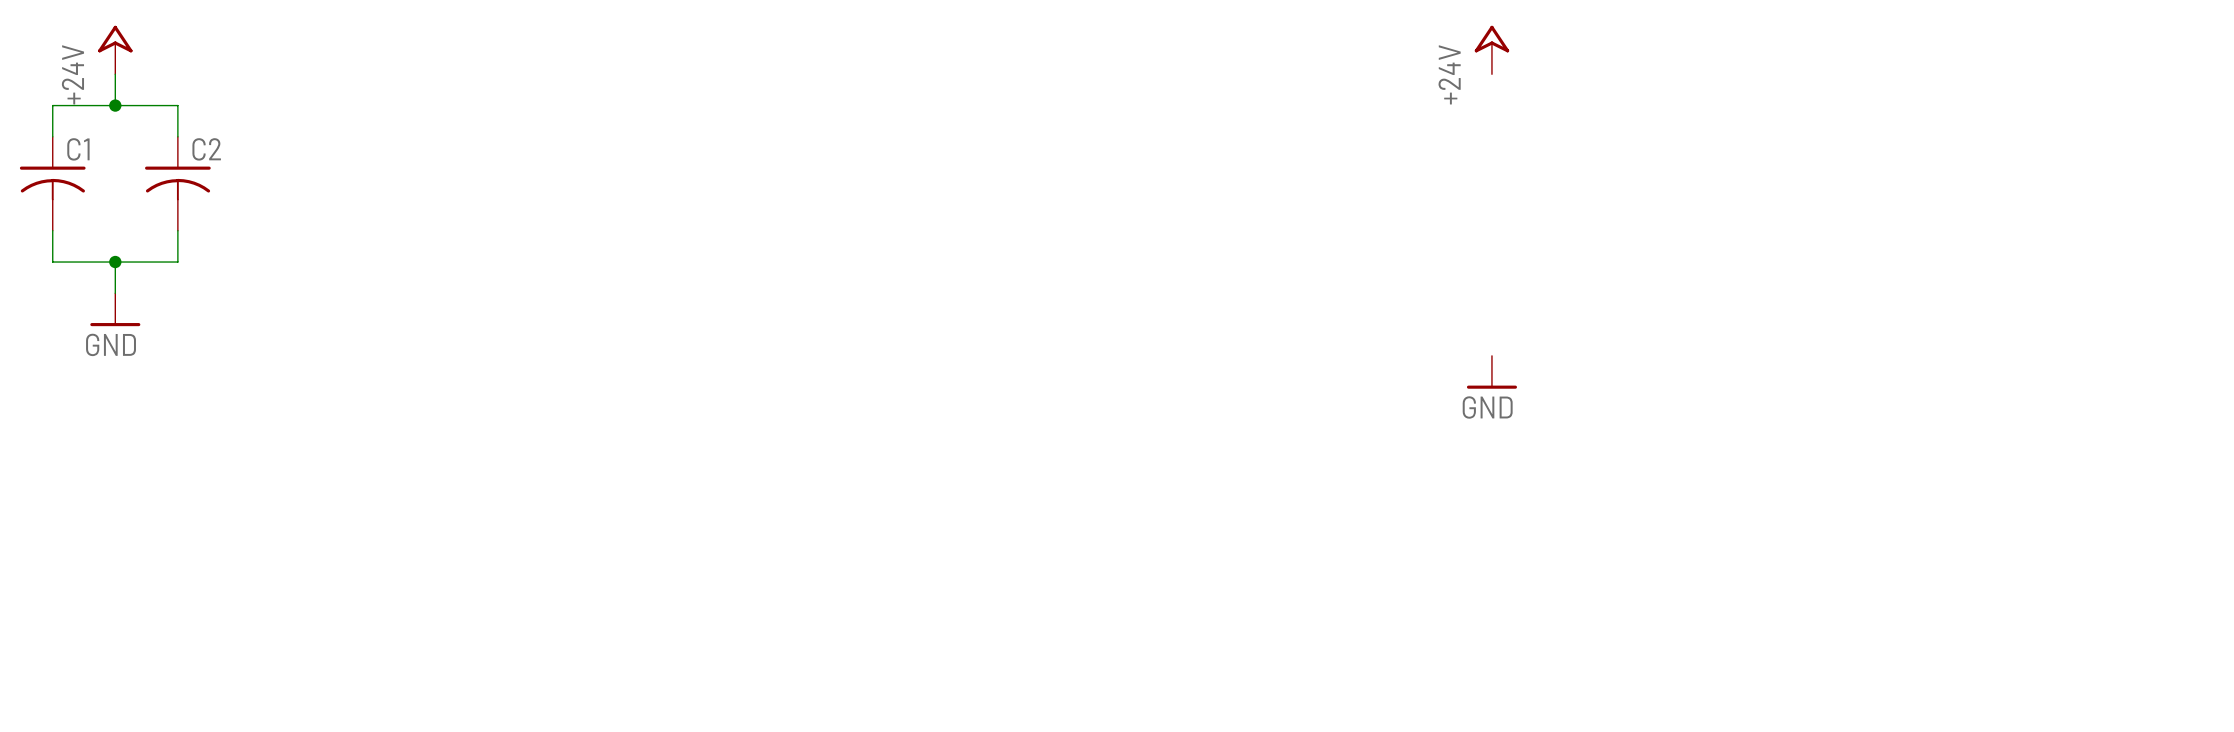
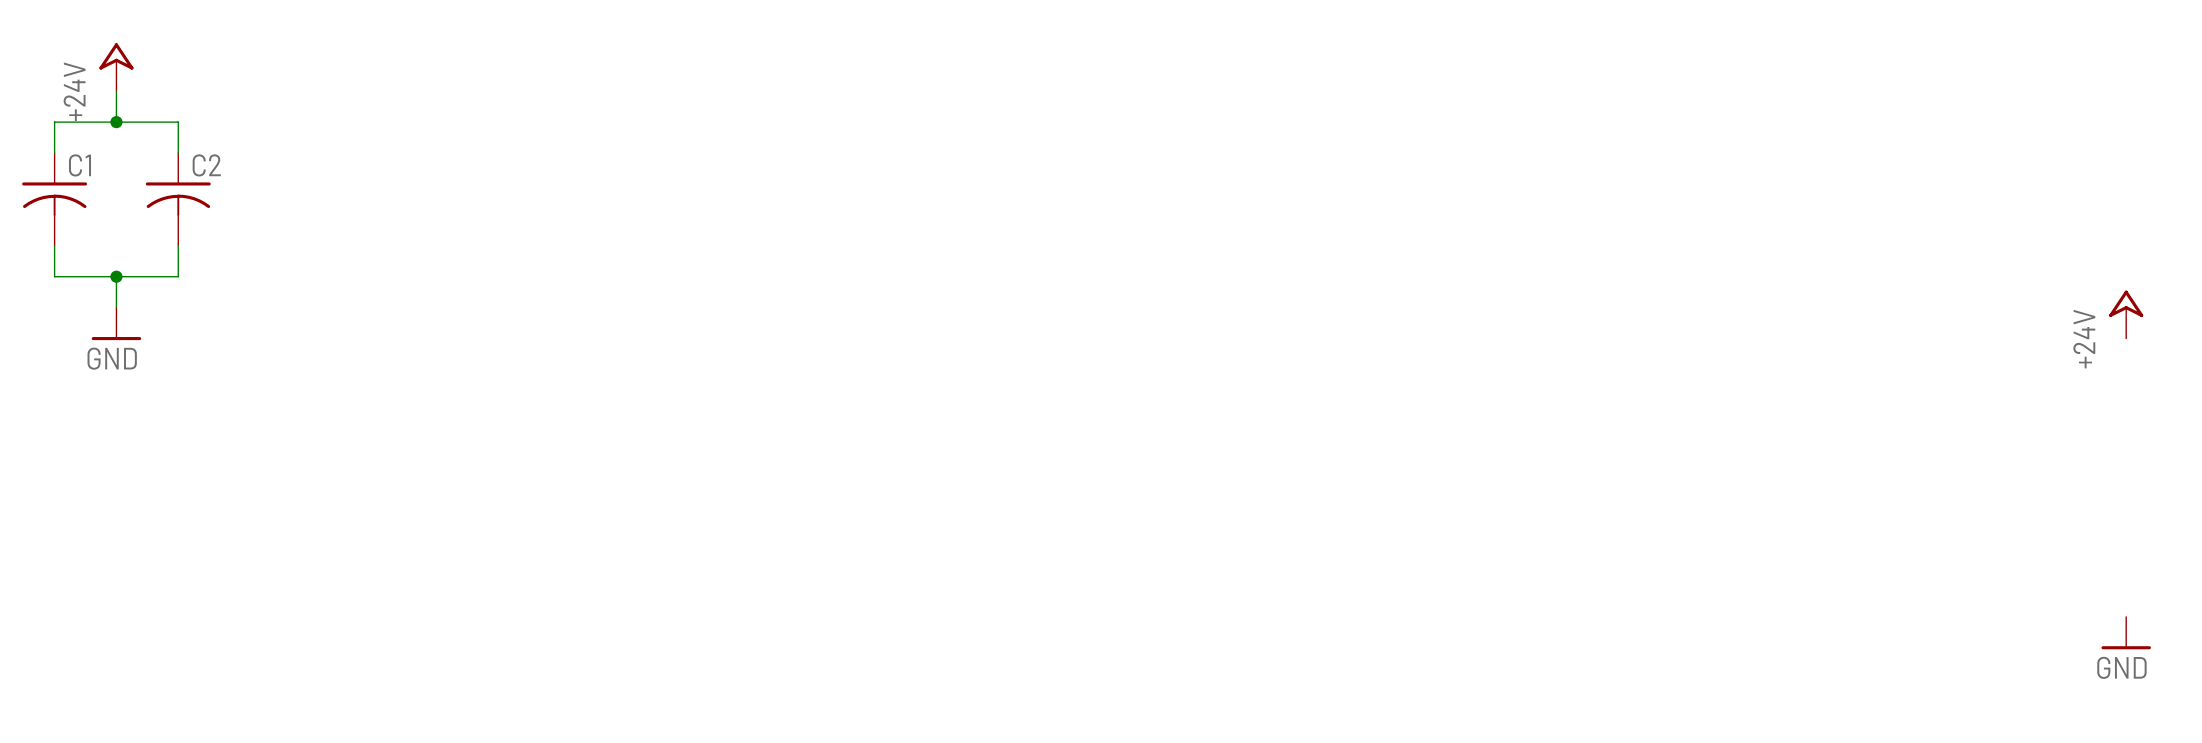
power symbol: +24V (1491, 50) -> none
power symbol: none -> +24V (2126, 314)
power symbol: GND (1491, 372) -> none
power symbol: none -> GND (2126, 633)

